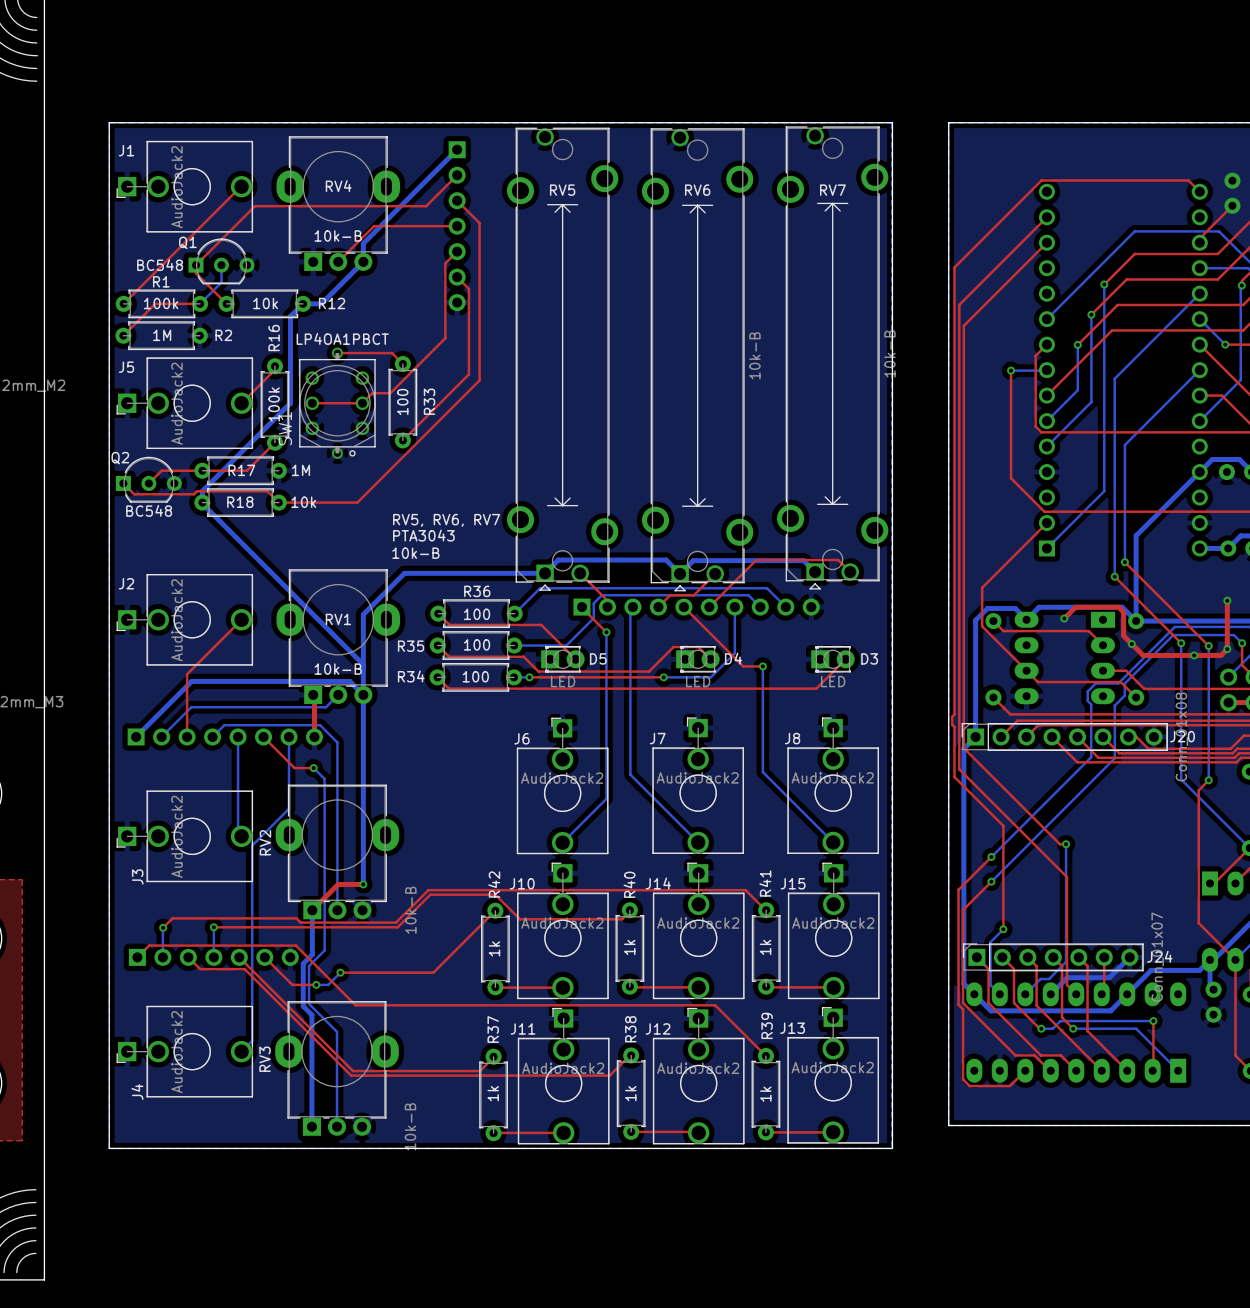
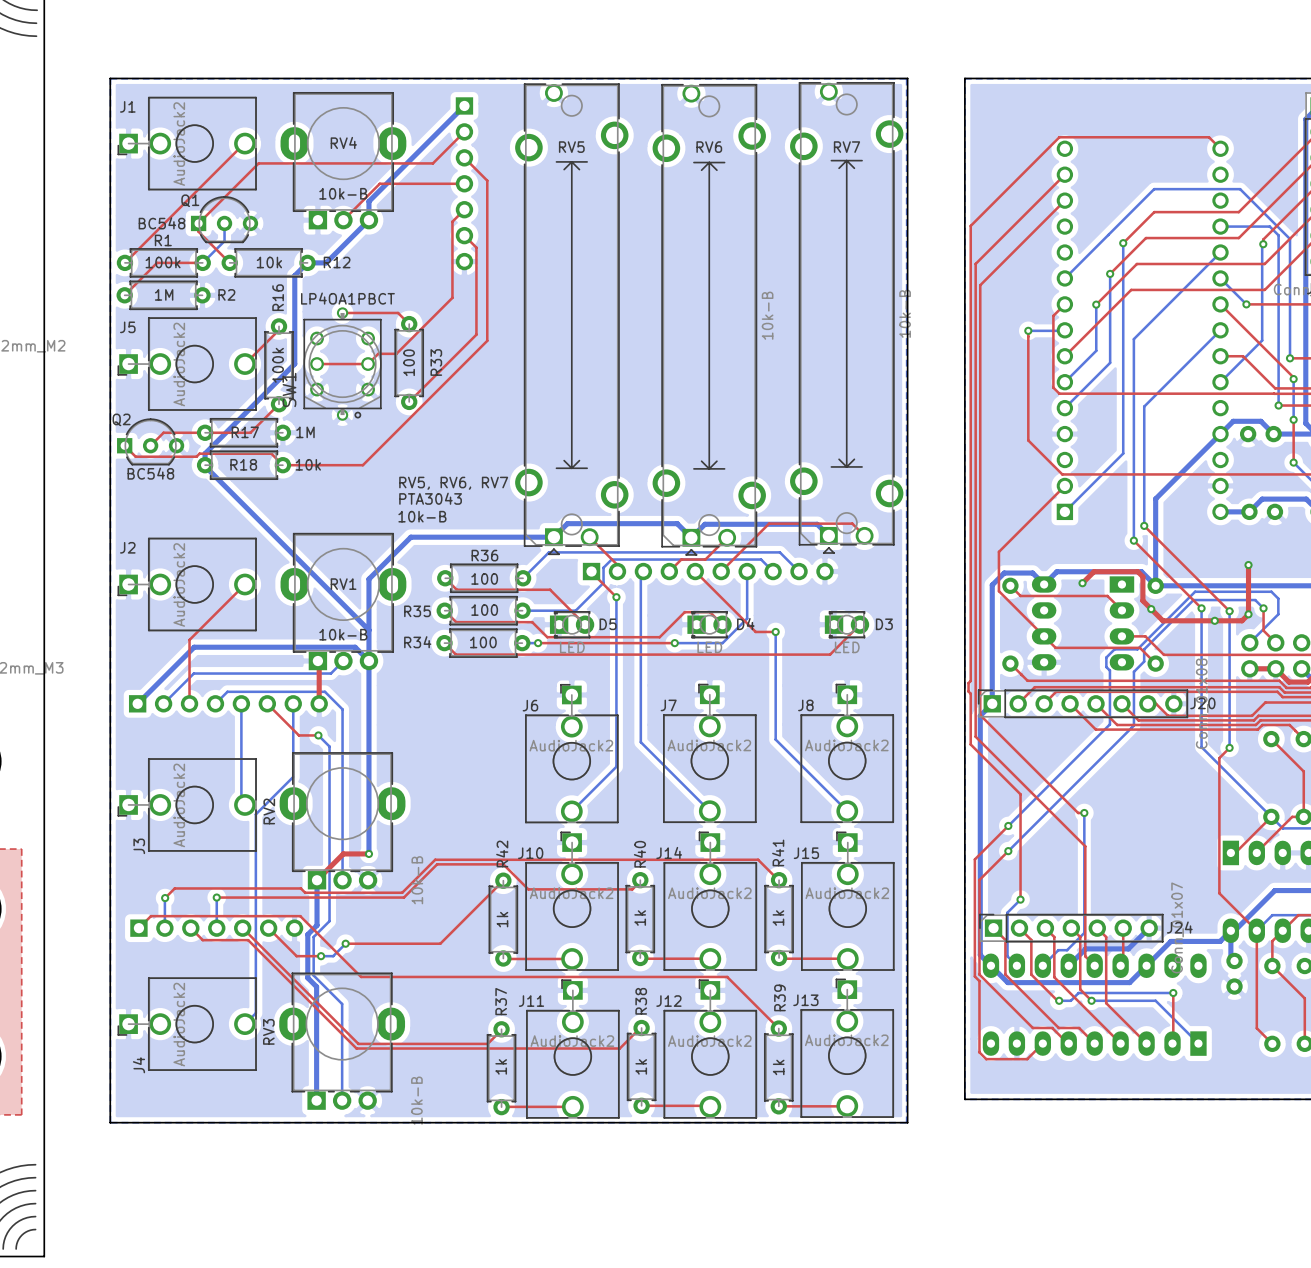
part: (1232, 193) -> none
top track: (1232, 205) (1199, 238) (1199, 242) -> none

